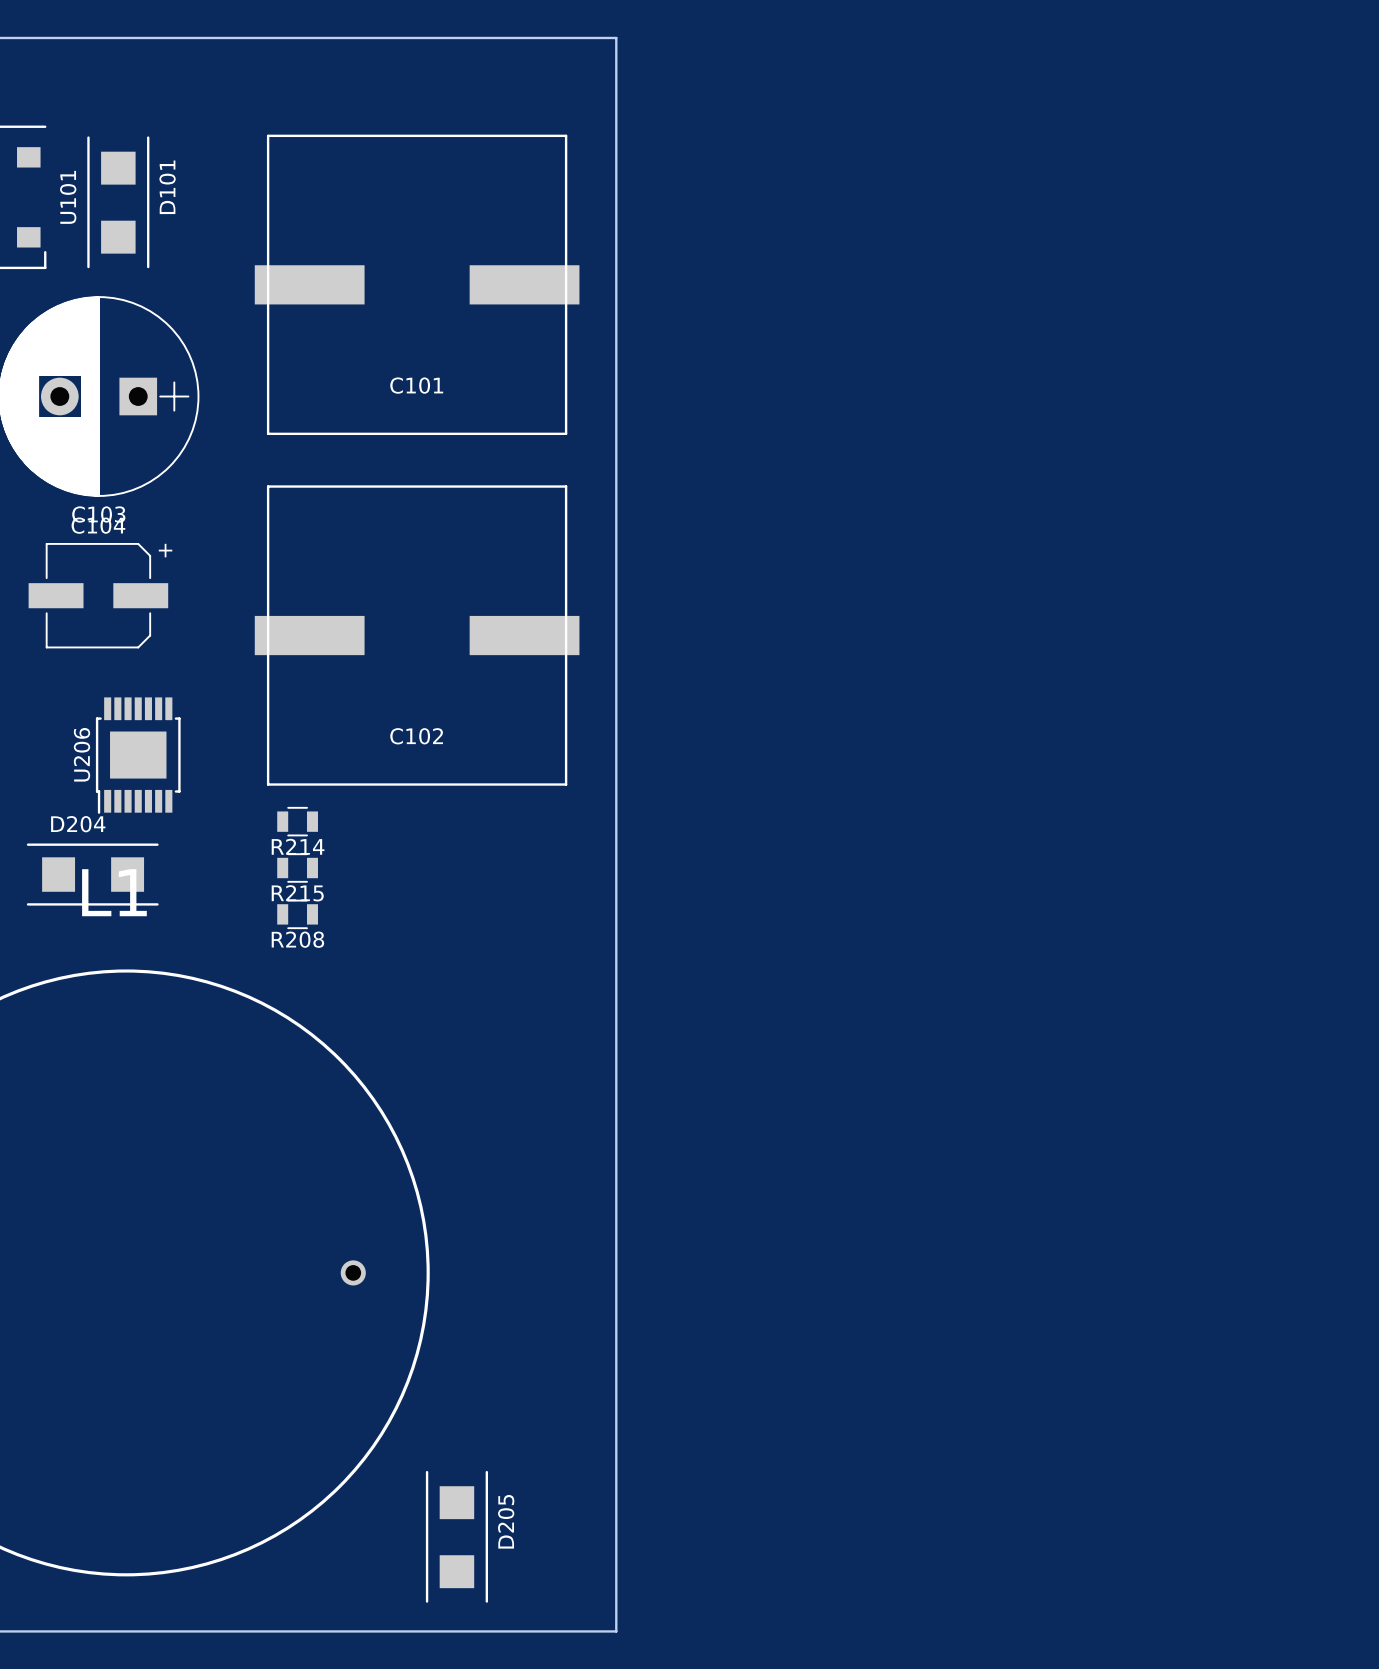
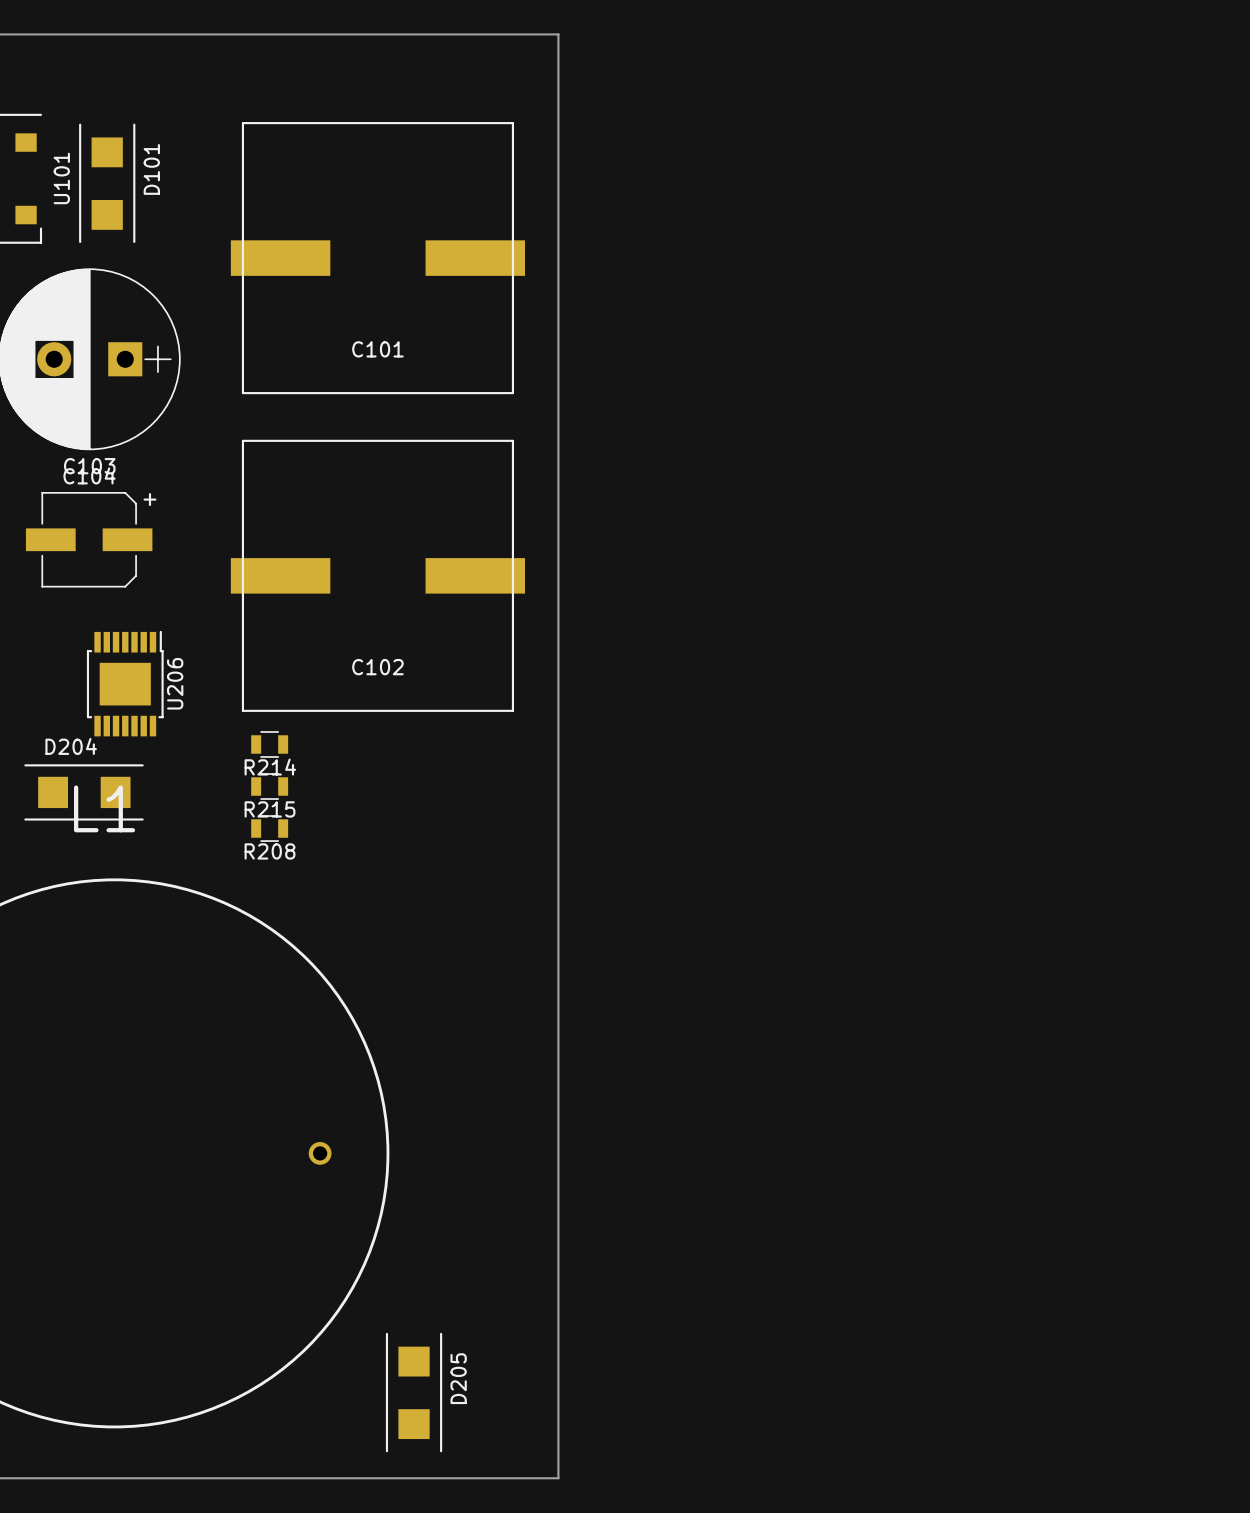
U206 rotation: 0° (138, 755) -> 180° (125, 683)

